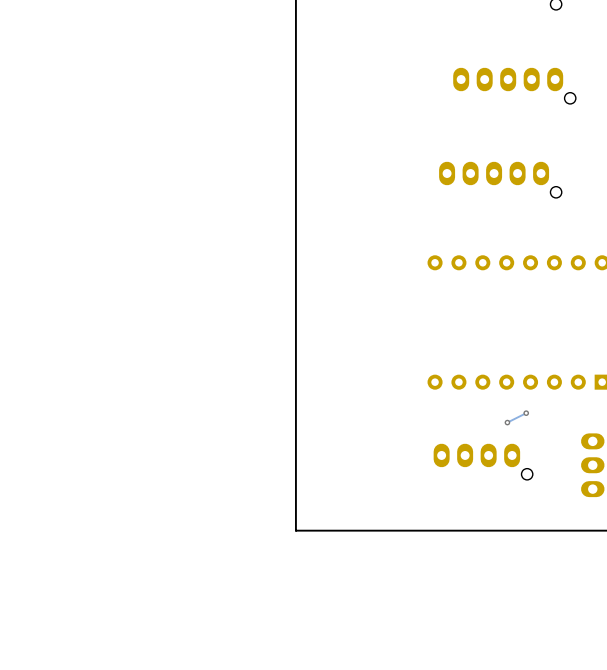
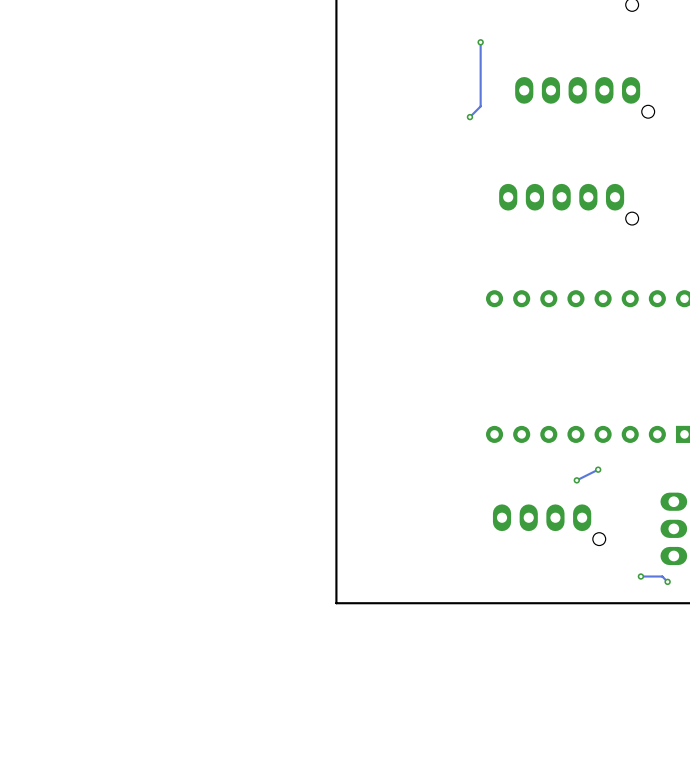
track: none -> (480, 42) (480, 106) (469, 117)
via: none -> (480, 42)
via: none -> (469, 117)
track: none -> (640, 576) (662, 576) (667, 581)
via: none -> (640, 576)
via: none -> (667, 581)

